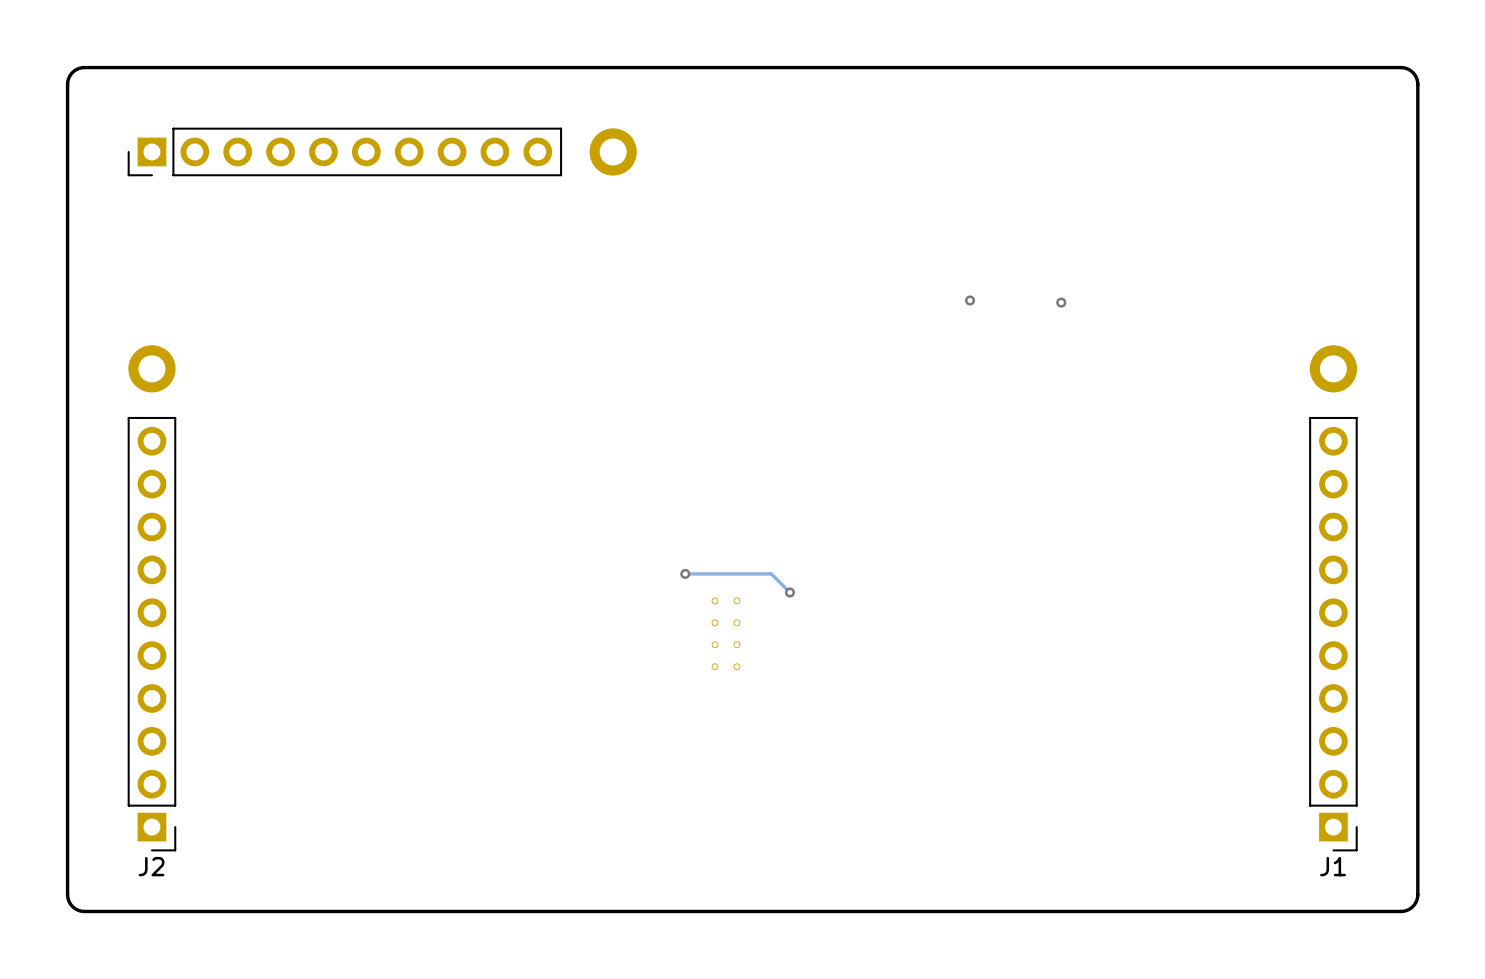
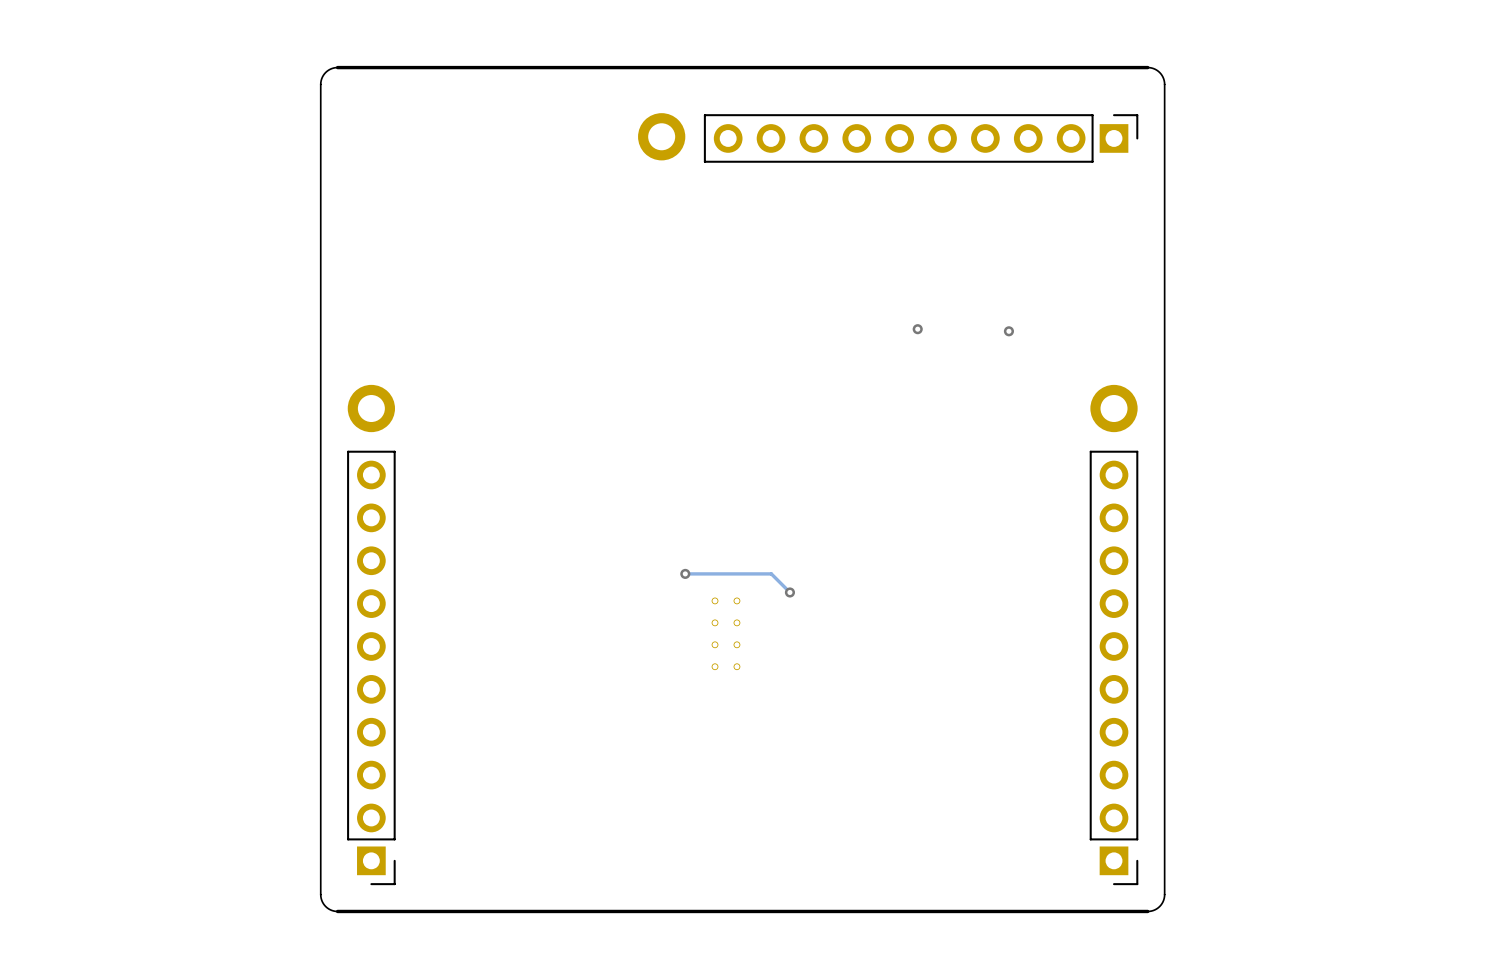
board edge: (337, 67) (82, 67) (71, 73) (67, 84) (68, 900) (75, 908) (84, 911) (337, 911) -> (337, 67) (325, 72) (320, 84) (320, 894) (325, 906) (337, 911)
board edge: (1147, 67) (1402, 67) (1412, 72) (1417, 84) (1416, 900) (1411, 907) (1400, 911) (1147, 911) -> (1147, 67) (1159, 72) (1164, 84) (1164, 894) (1159, 906) (1147, 911)
part: none -> (921, 138)
part: (344, 151) -> none
part position: (613, 151) -> (661, 136)
via: (970, 300) -> none
via: (1061, 302) -> none
via: none -> (917, 329)
via: none -> (1008, 331)
part: (151, 368) -> none
part position: (1333, 368) -> (1114, 408)
part: none -> (371, 408)
J2: (151, 634) -> none
J1: (1333, 634) -> none
part: none -> (371, 667)
part: none -> (1114, 667)

